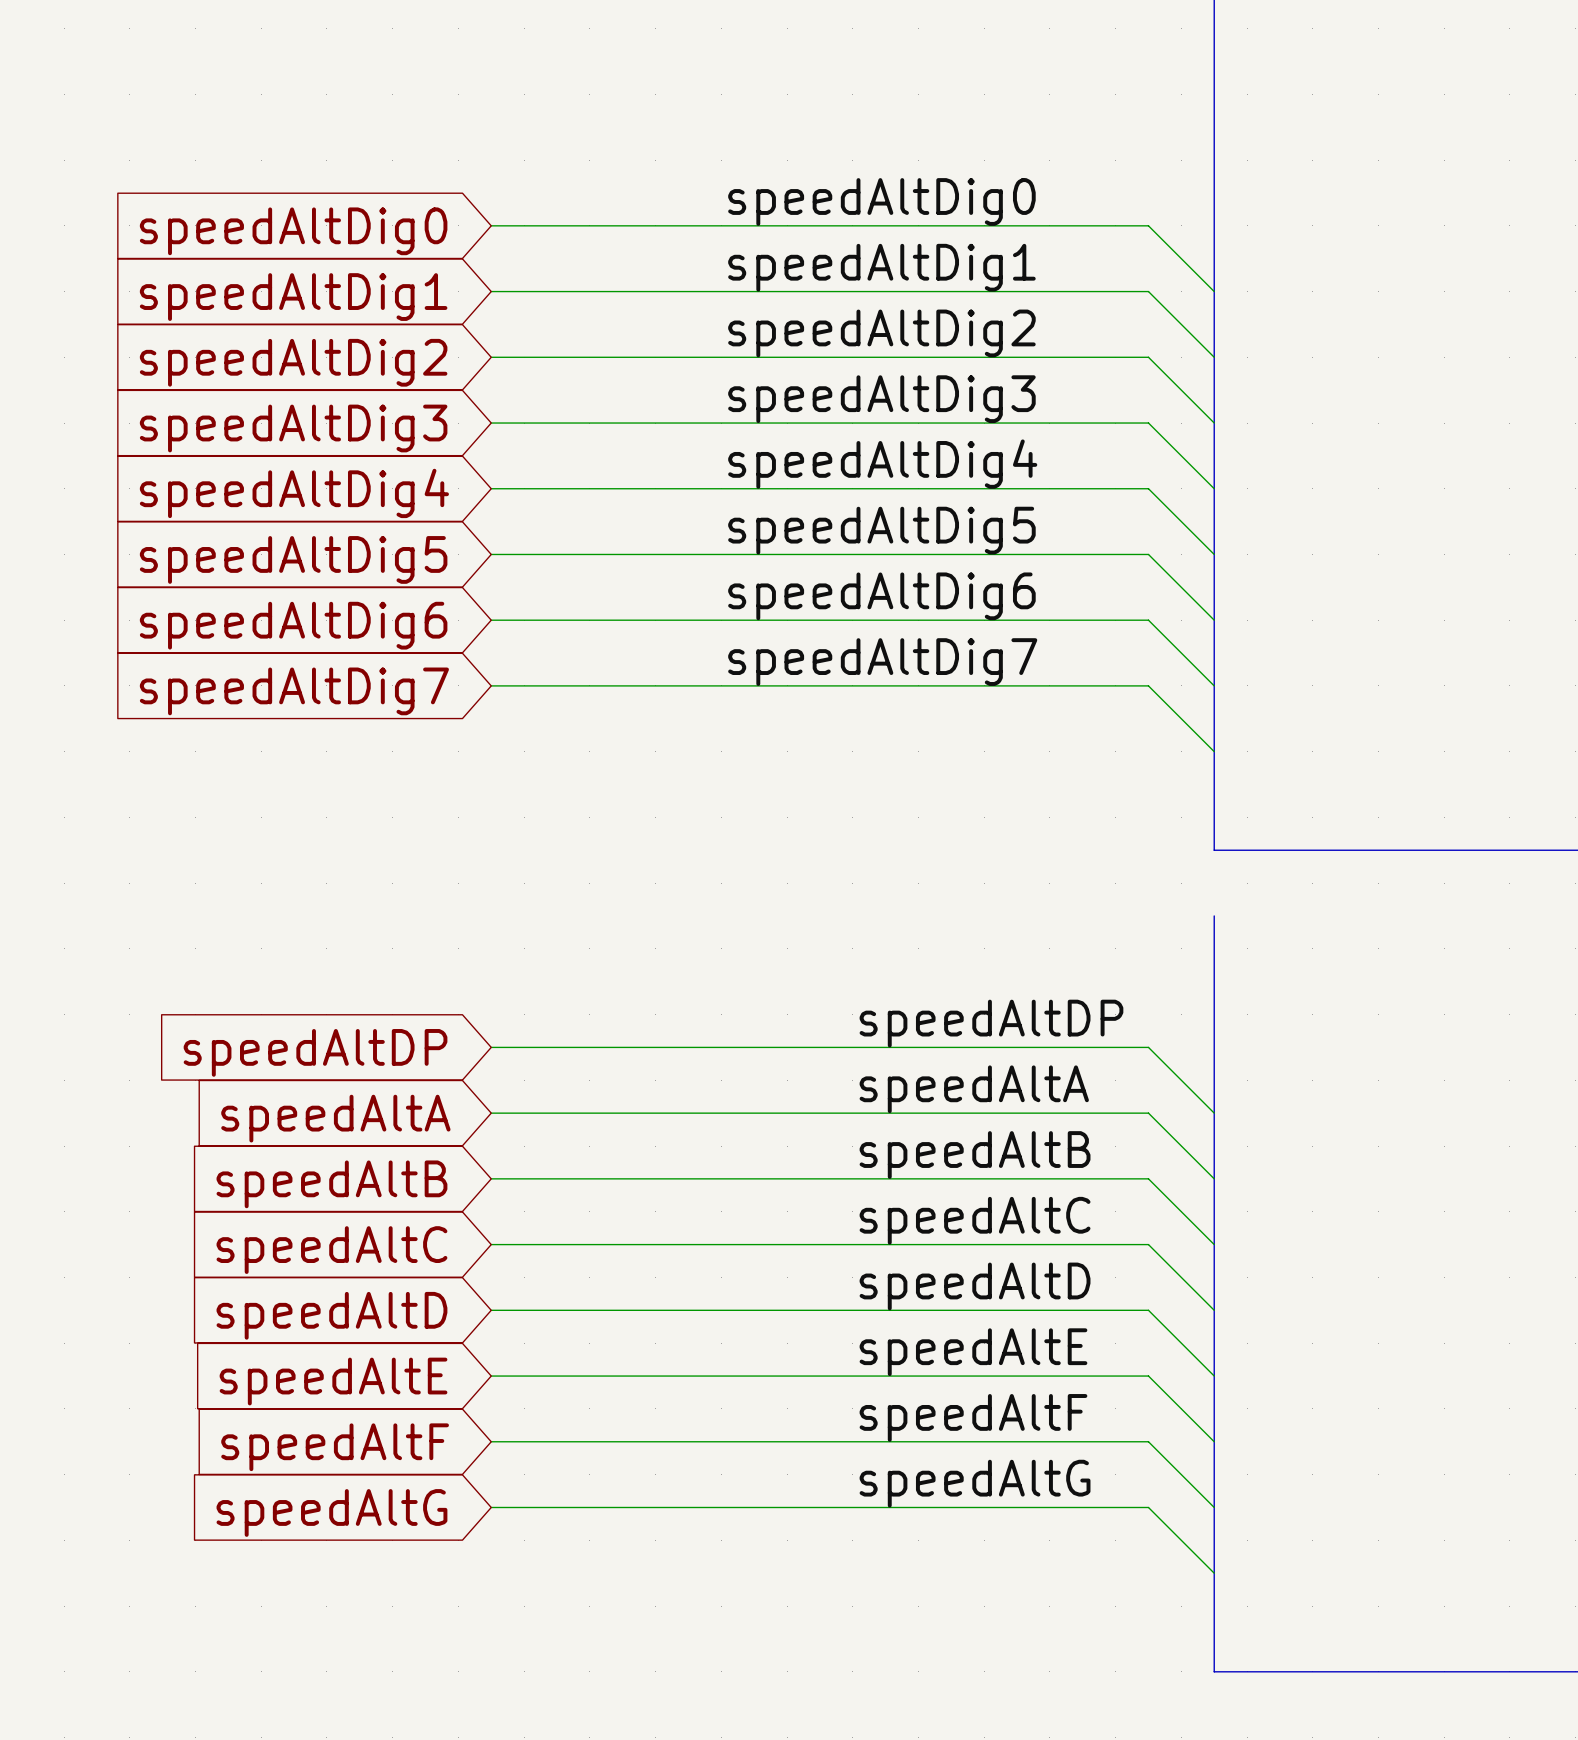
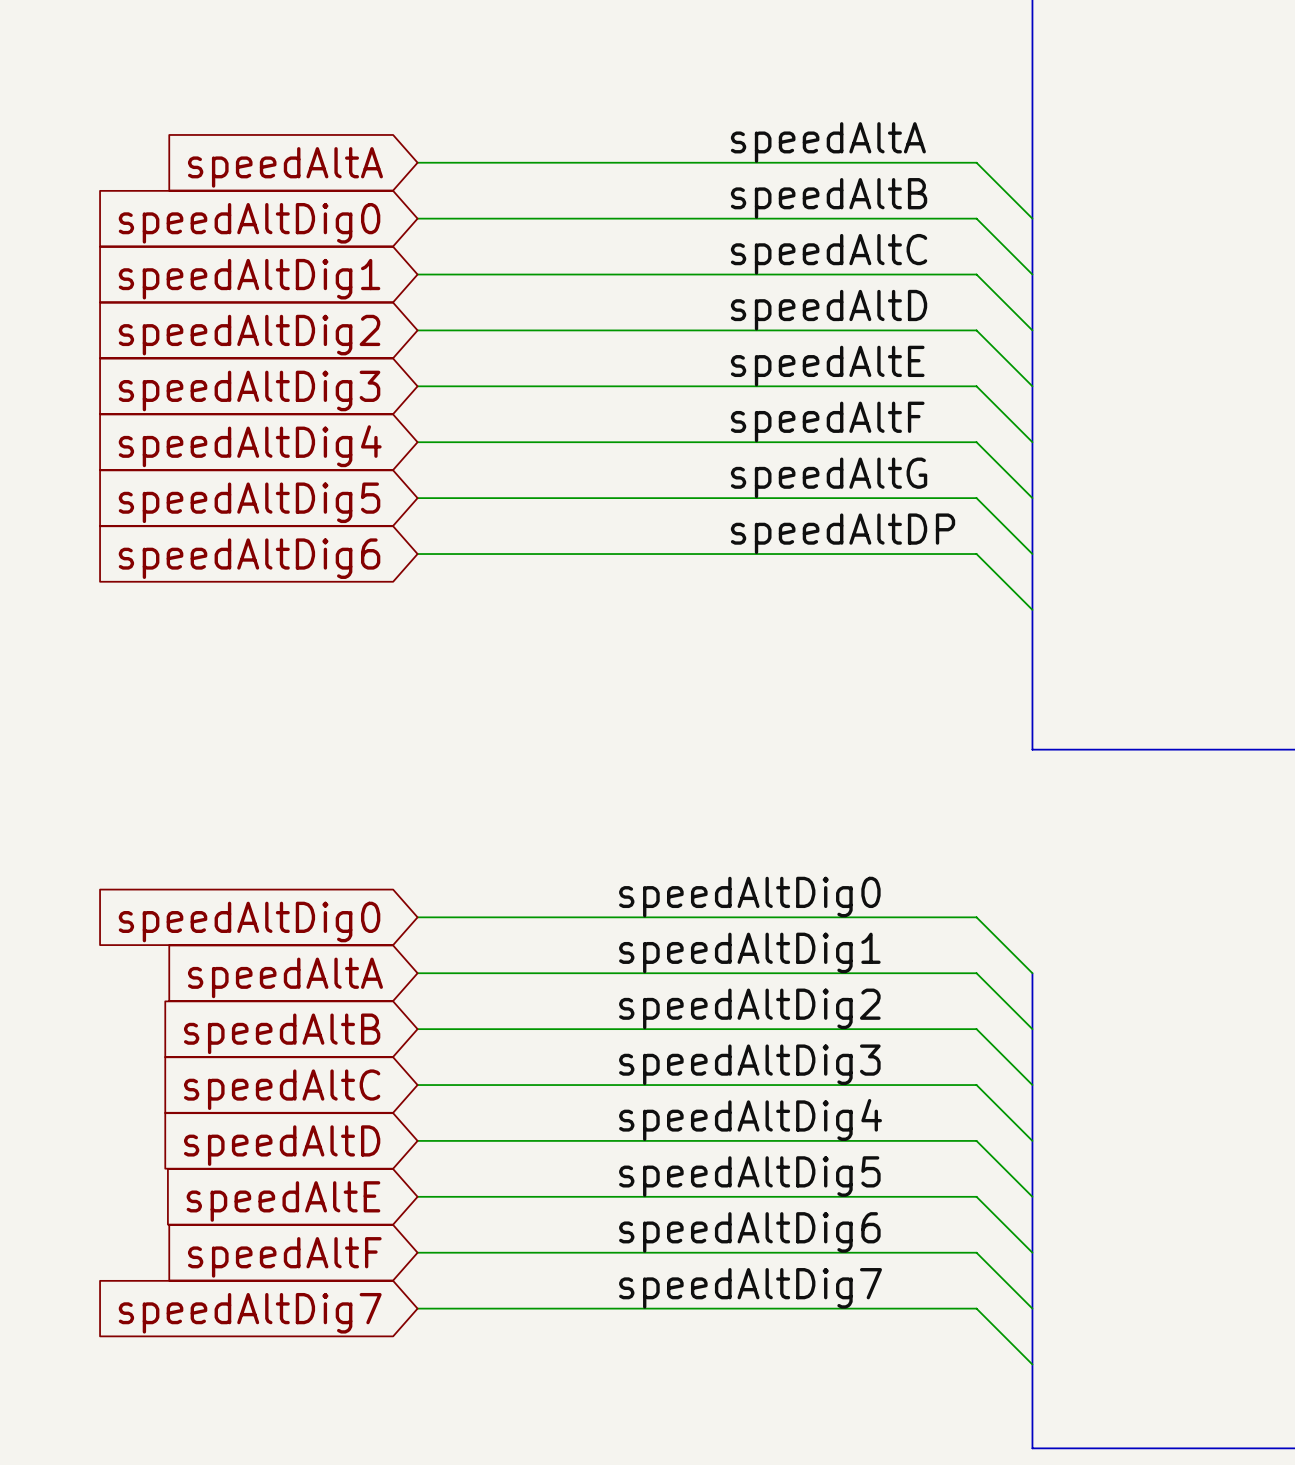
label: none -> speedAltA (828, 142)
global label: none -> speedAltA (285, 167)
label: speedAltDig0 (881, 201) -> none
label: none -> speedAltB (829, 198)
label: speedAltDig1 (881, 267) -> none
label: none -> speedAltC (829, 254)
label: speedAltDig2 (881, 333) -> none
label: none -> speedAltD (829, 310)
label: speedAltDig3 (881, 399) -> none
label: none -> speedAltE (827, 366)
label: speedAltDig4 (882, 464) -> none
label: none -> speedAltF (827, 421)
label: speedAltDig5 (881, 530) -> none
label: none -> speedAltG (829, 477)
label: speedAltDig6 (881, 596) -> none
label: speedAltDig7 (882, 662) -> none
wire: (491, 685) (1148, 685) (1214, 751) -> (417, 162) (976, 162) (1032, 218)
global label: speedAltDig7 (294, 691) -> none
bus: (1214, 915) (1214, 1113) -> none
label: none -> speedAltDig0 (749, 897)
label position: speedAltDP (991, 1023) -> speedAltDP (843, 533)
global label: speedAltDP (315, 1052) -> speedAltDig0 (249, 921)
label: none -> speedAltDig1 (749, 952)
label: speedAltA (974, 1089) -> none
label: none -> speedAltDig2 (749, 1008)
label: speedAltB (975, 1155) -> none
label: none -> speedAltDig3 (749, 1064)
label: speedAltC (975, 1220) -> none
label: none -> speedAltDig4 (750, 1119)
label: speedAltD (975, 1286) -> none
label: none -> speedAltDig5 (749, 1176)
label: speedAltE (973, 1352) -> none
label: none -> speedAltDig6 (749, 1232)
label: speedAltF (973, 1417) -> none
label: none -> speedAltDig7 (750, 1288)
label: speedAltG (975, 1483) -> none
global label: speedAltG (331, 1512) -> speedAltDig7 (250, 1313)

